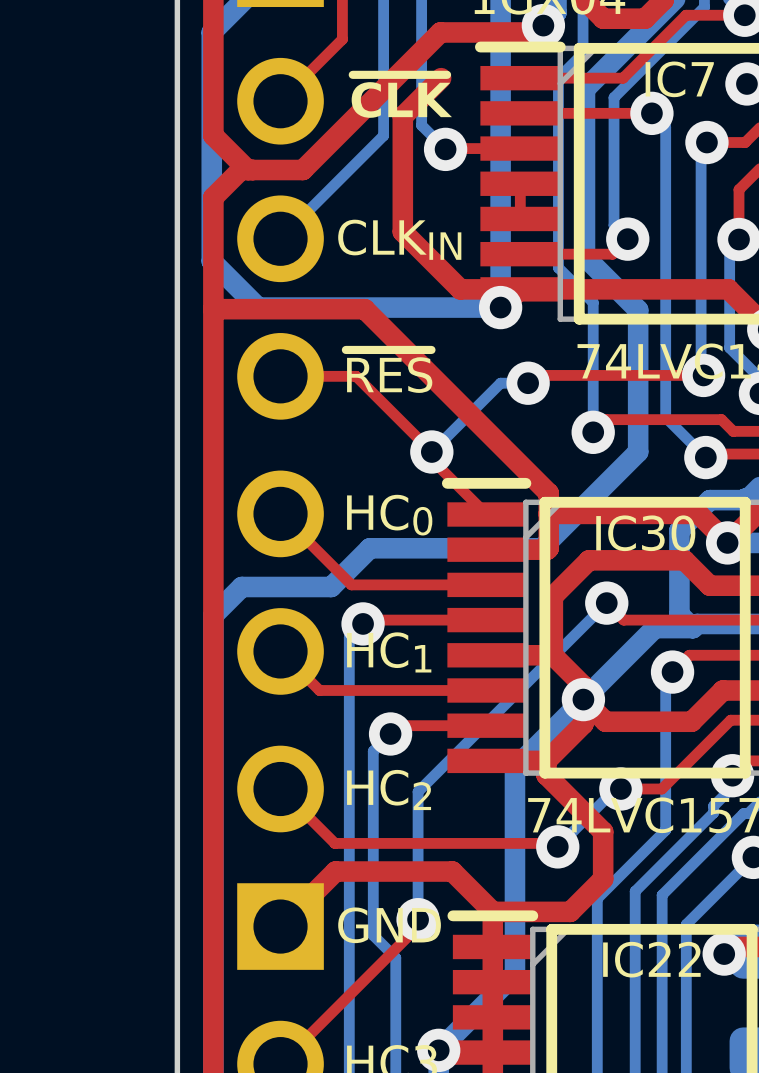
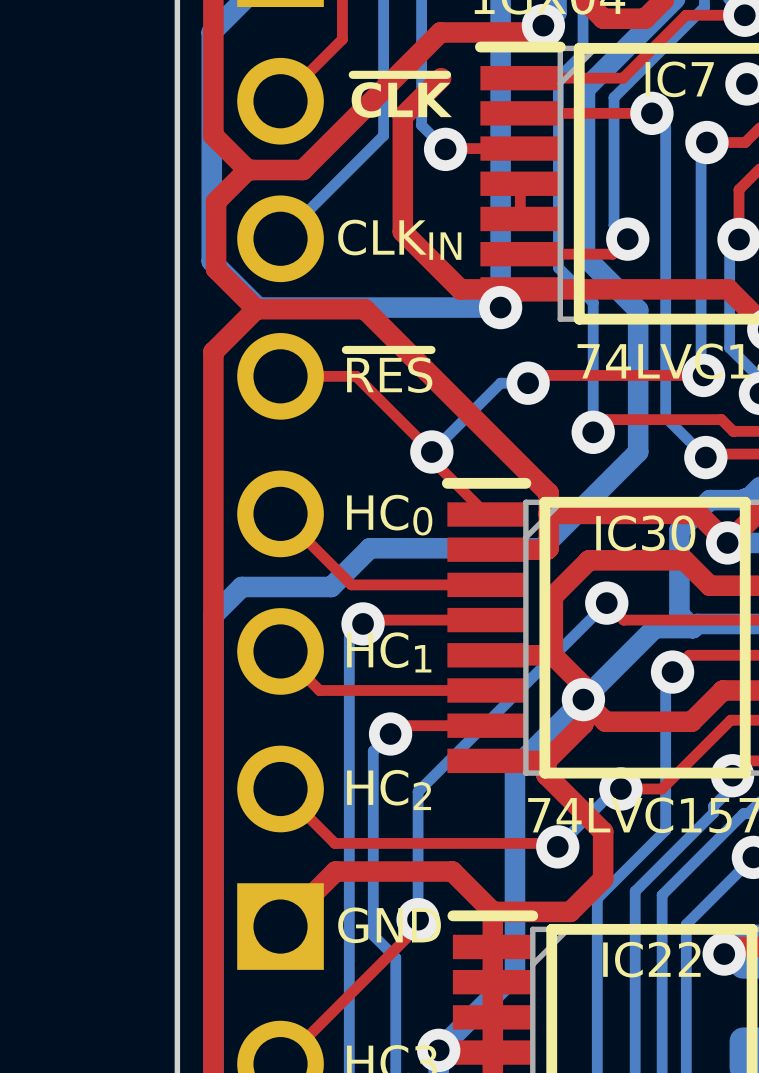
top track: (247, 170) (240, 170) (213, 197) (213, 352) -> (247, 170) (216, 201) (216, 269) (256, 309) (213, 352)
top track: (213, 309) (256, 309) -> none

